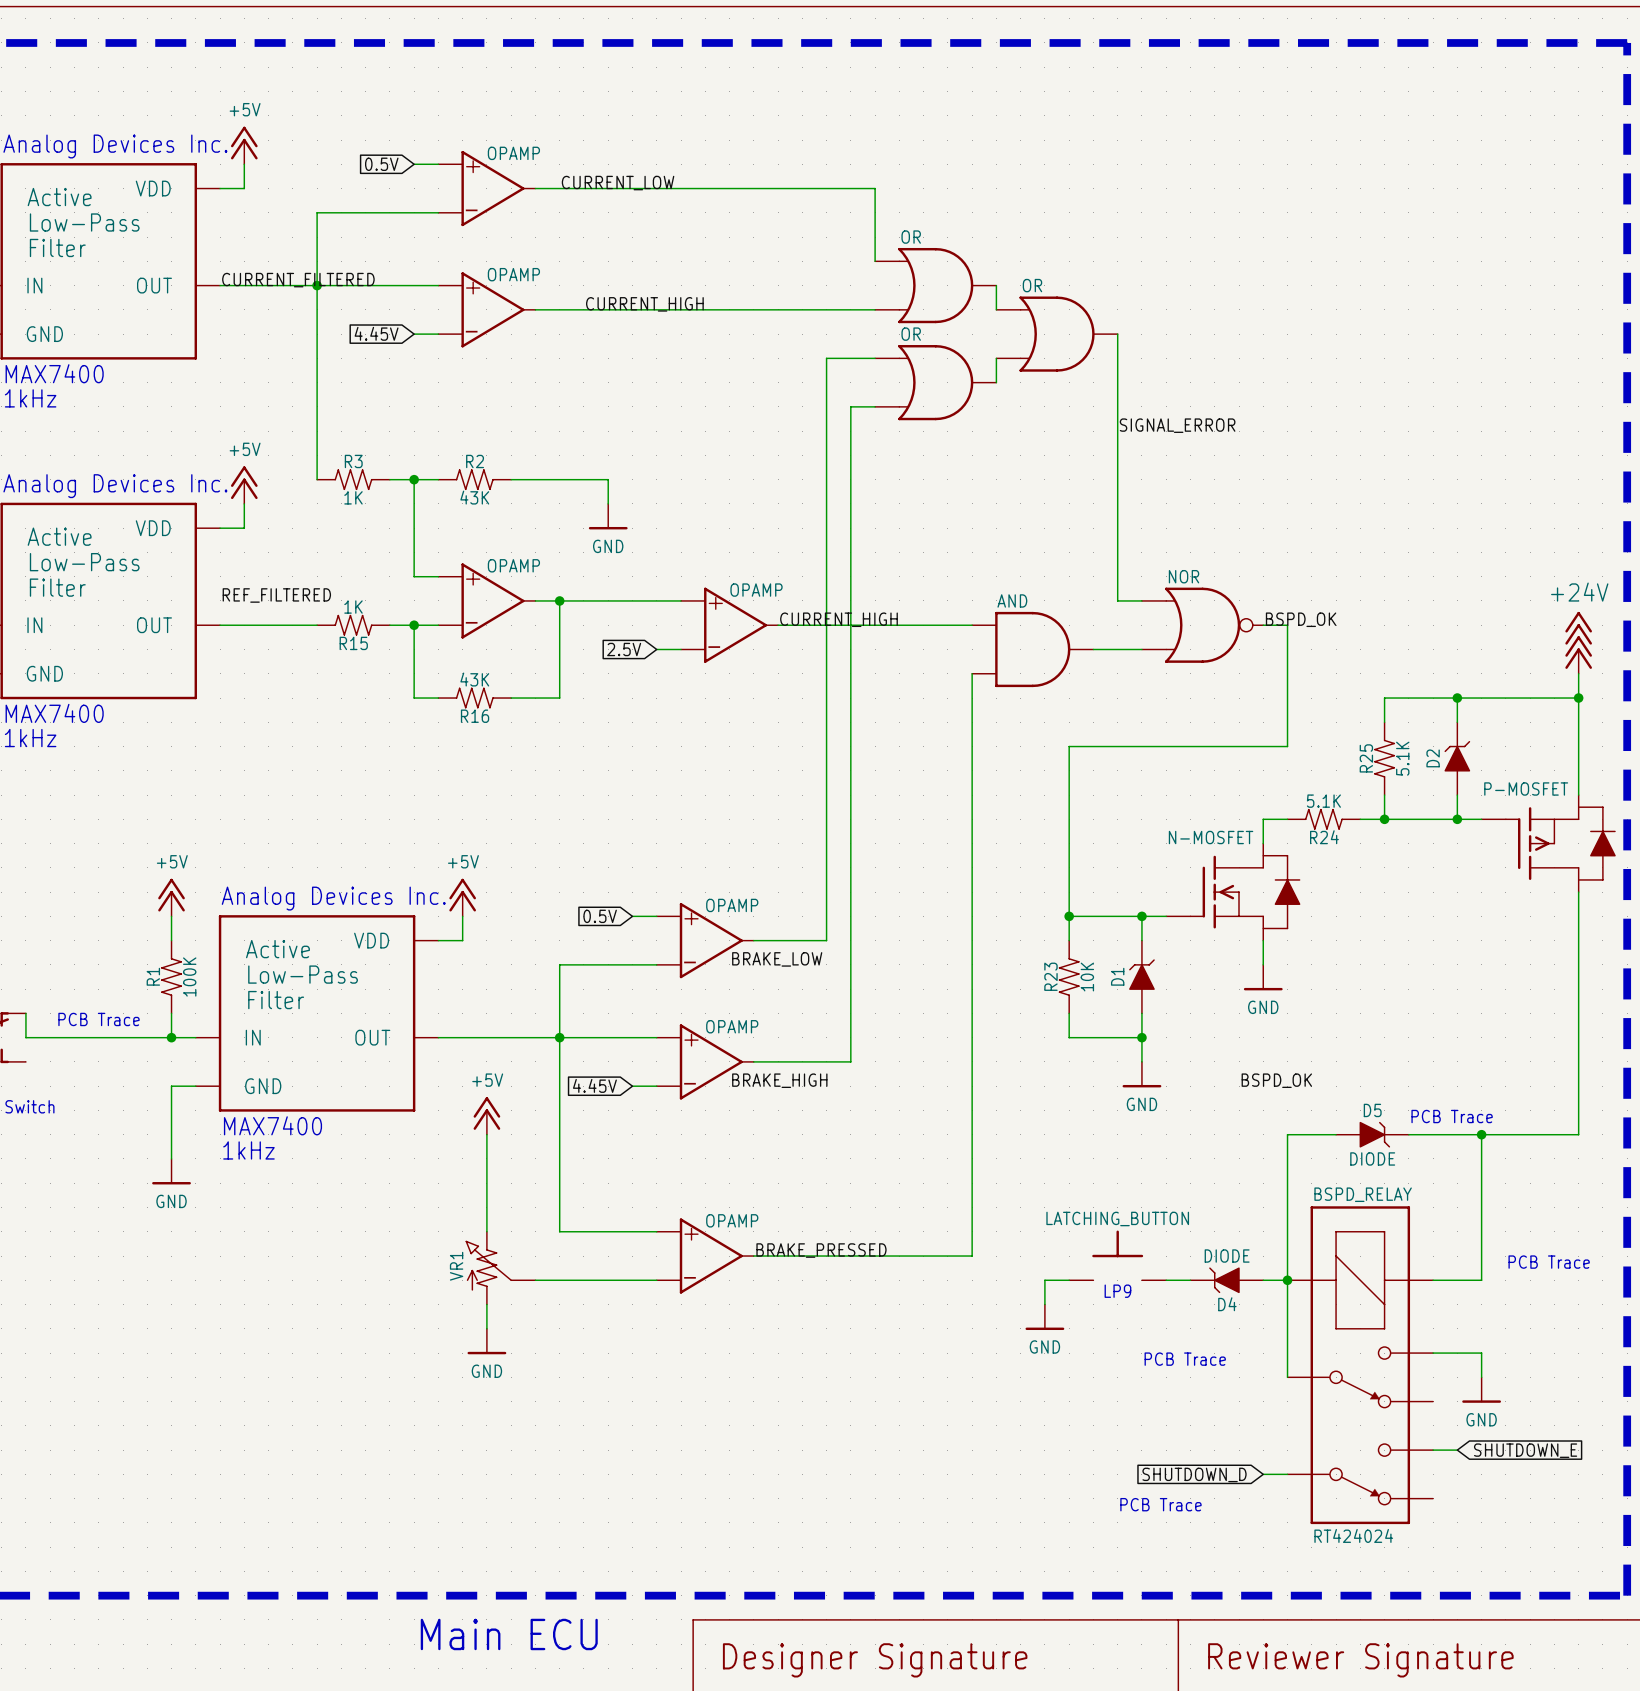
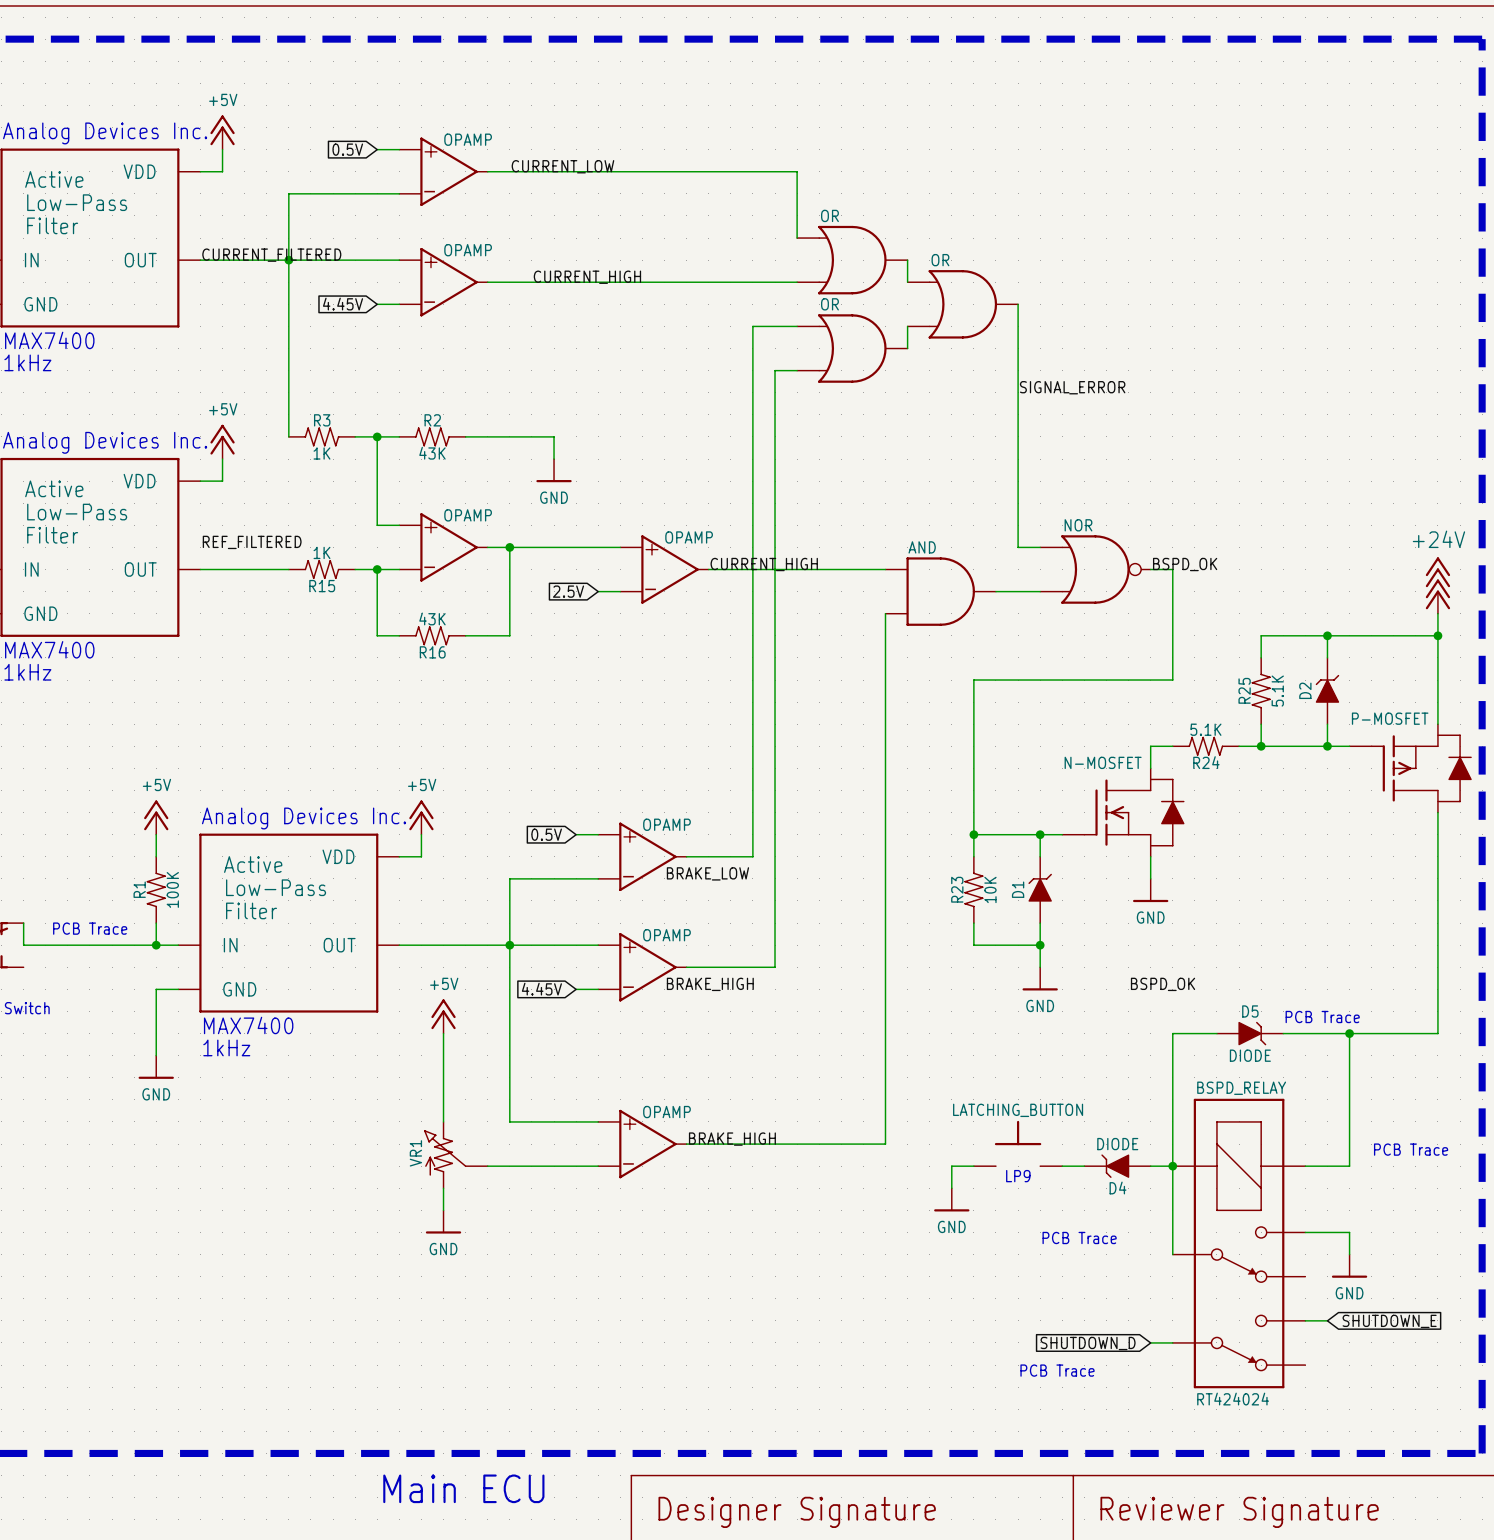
label: BRAKE_PRESSED (821, 1250) -> BRAKE_HIGH (732, 1139)

